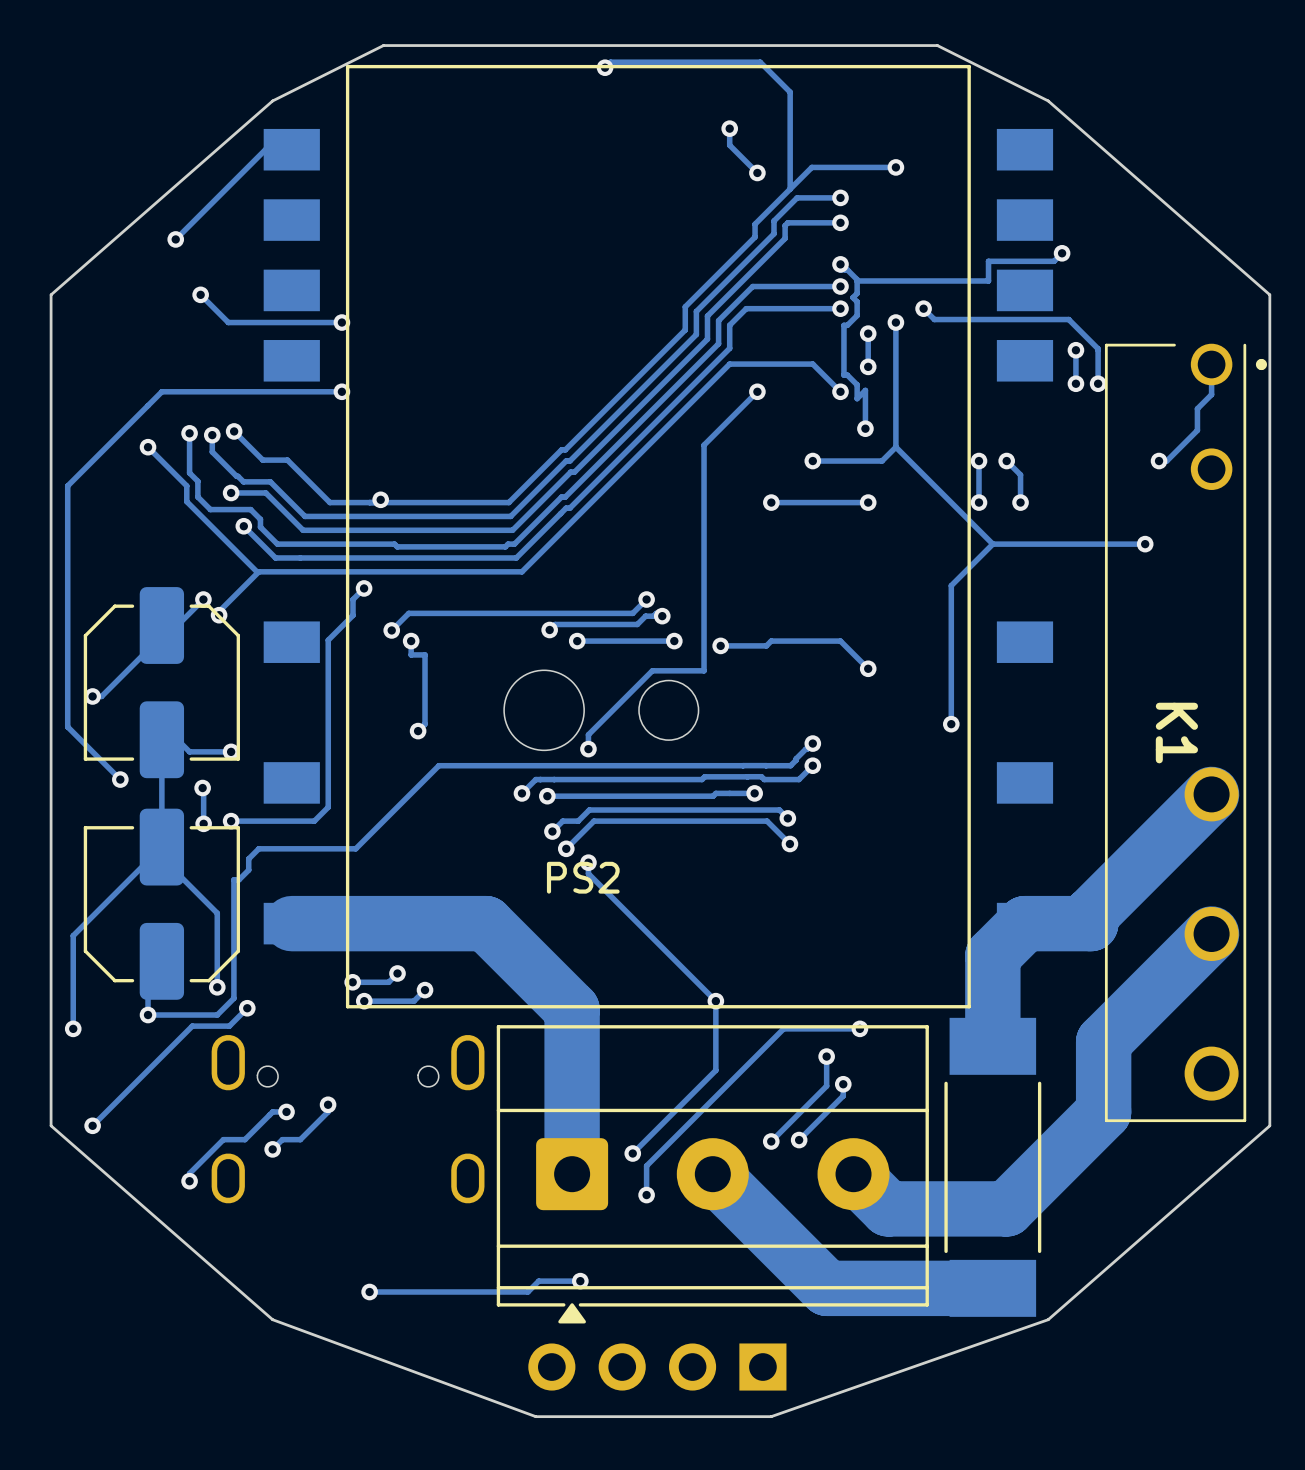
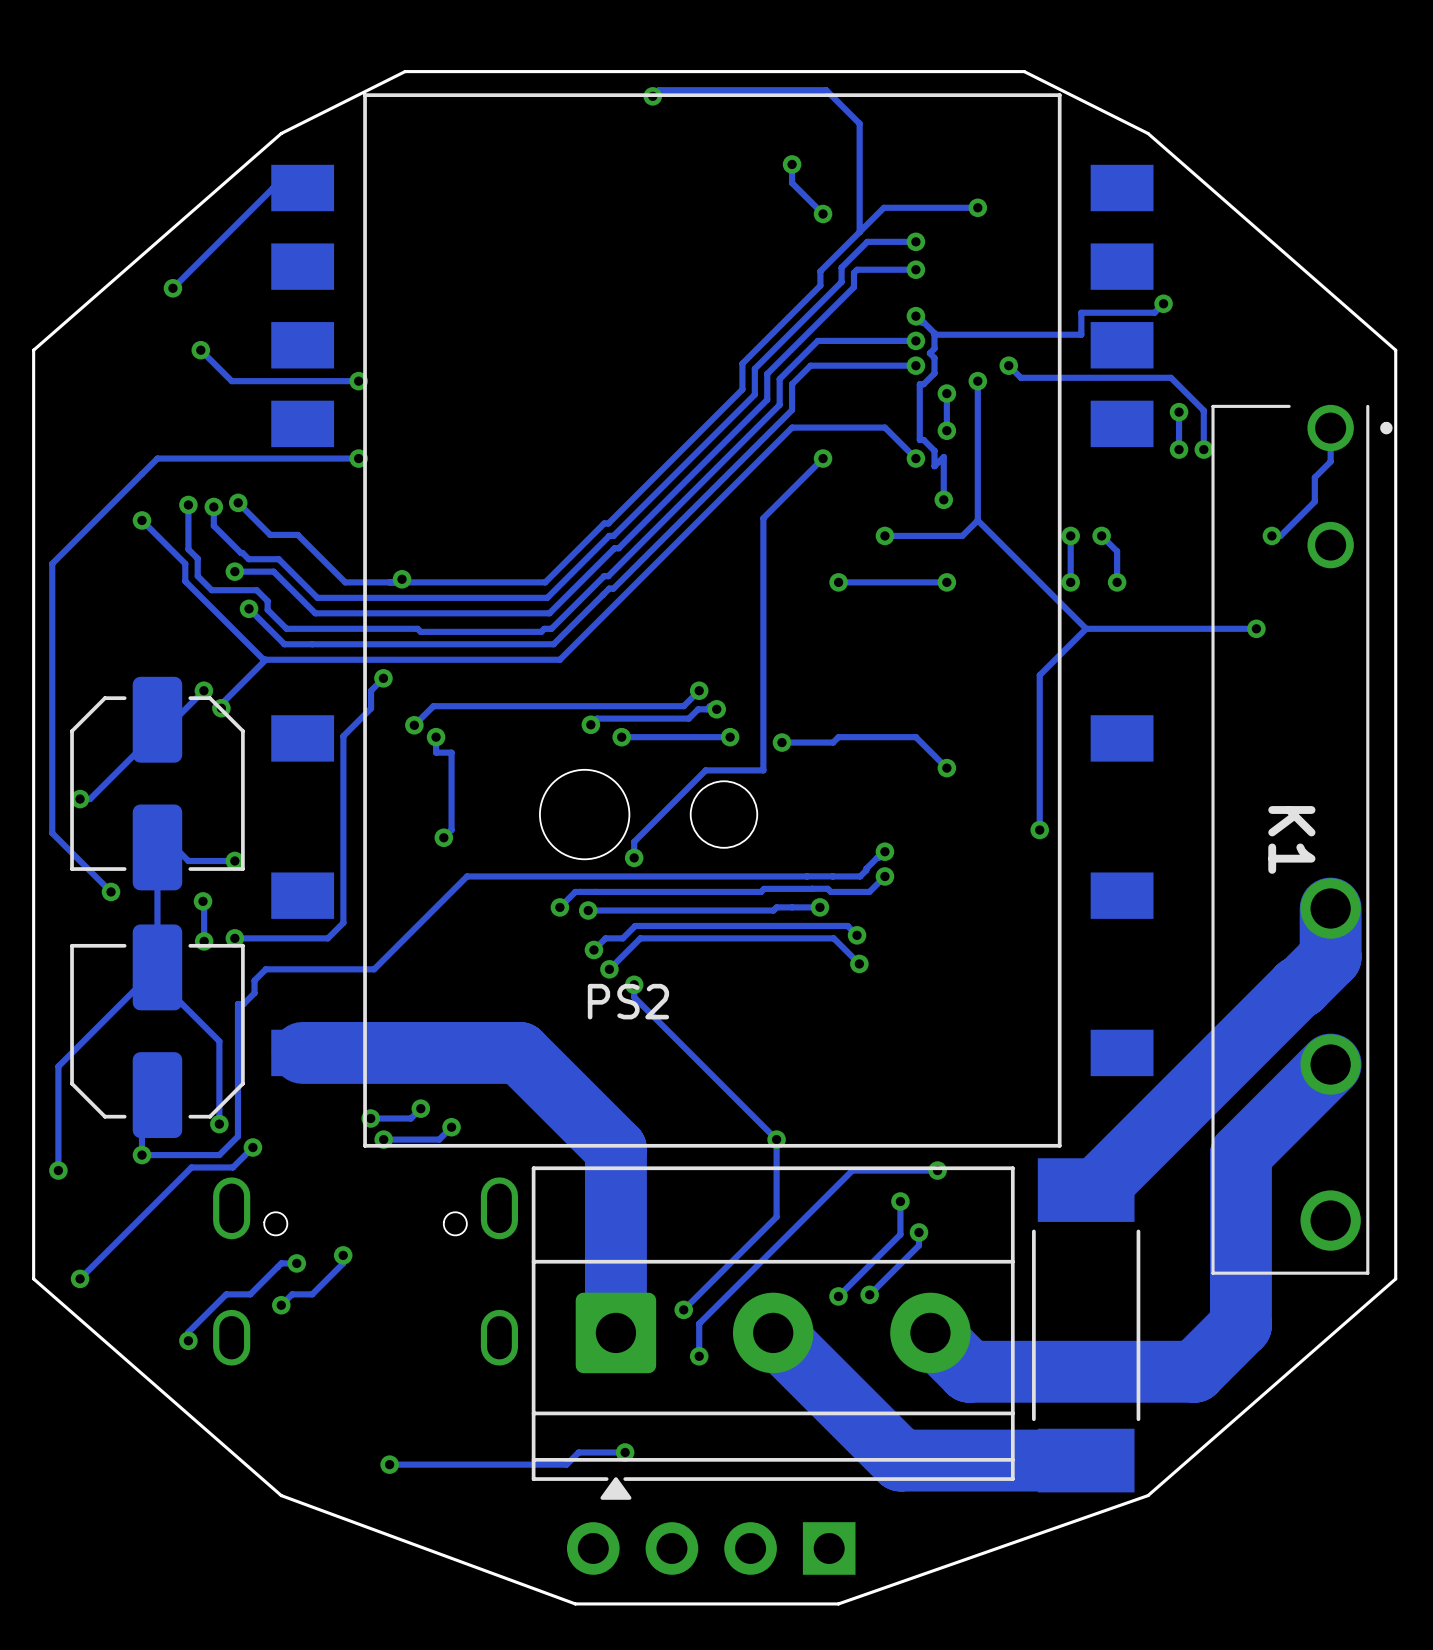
track: (1211, 794) (1090, 915) (1090, 923) (1024, 923) (992, 955) (992, 1046) -> (1330, 908) (1330, 957) (1095, 1190) (1086, 1190)
track: (1131, 1014) (1103, 1041) (1103, 1111) (1006, 1208) -> (1240, 1154) (1240, 1325) (1194, 1371) (1101, 1371)

